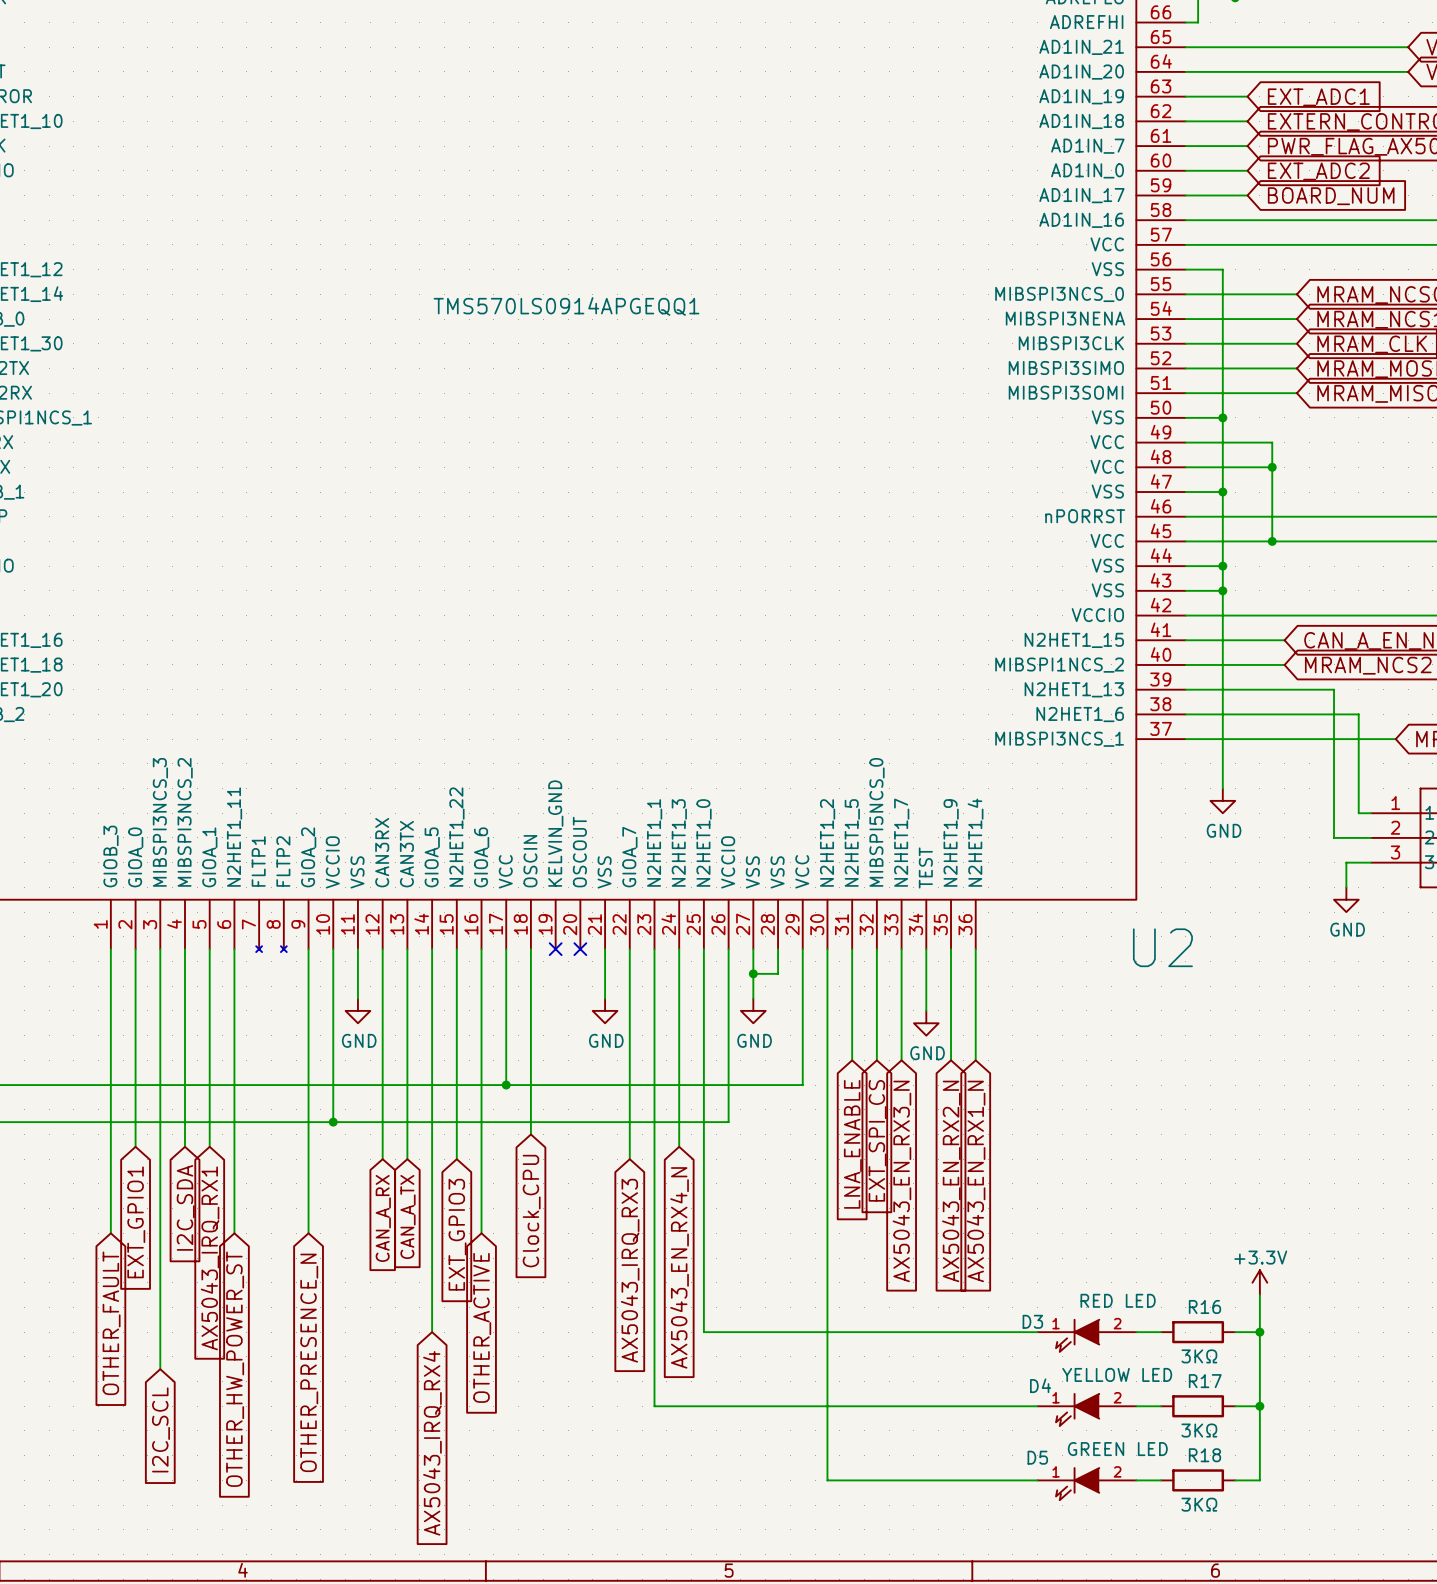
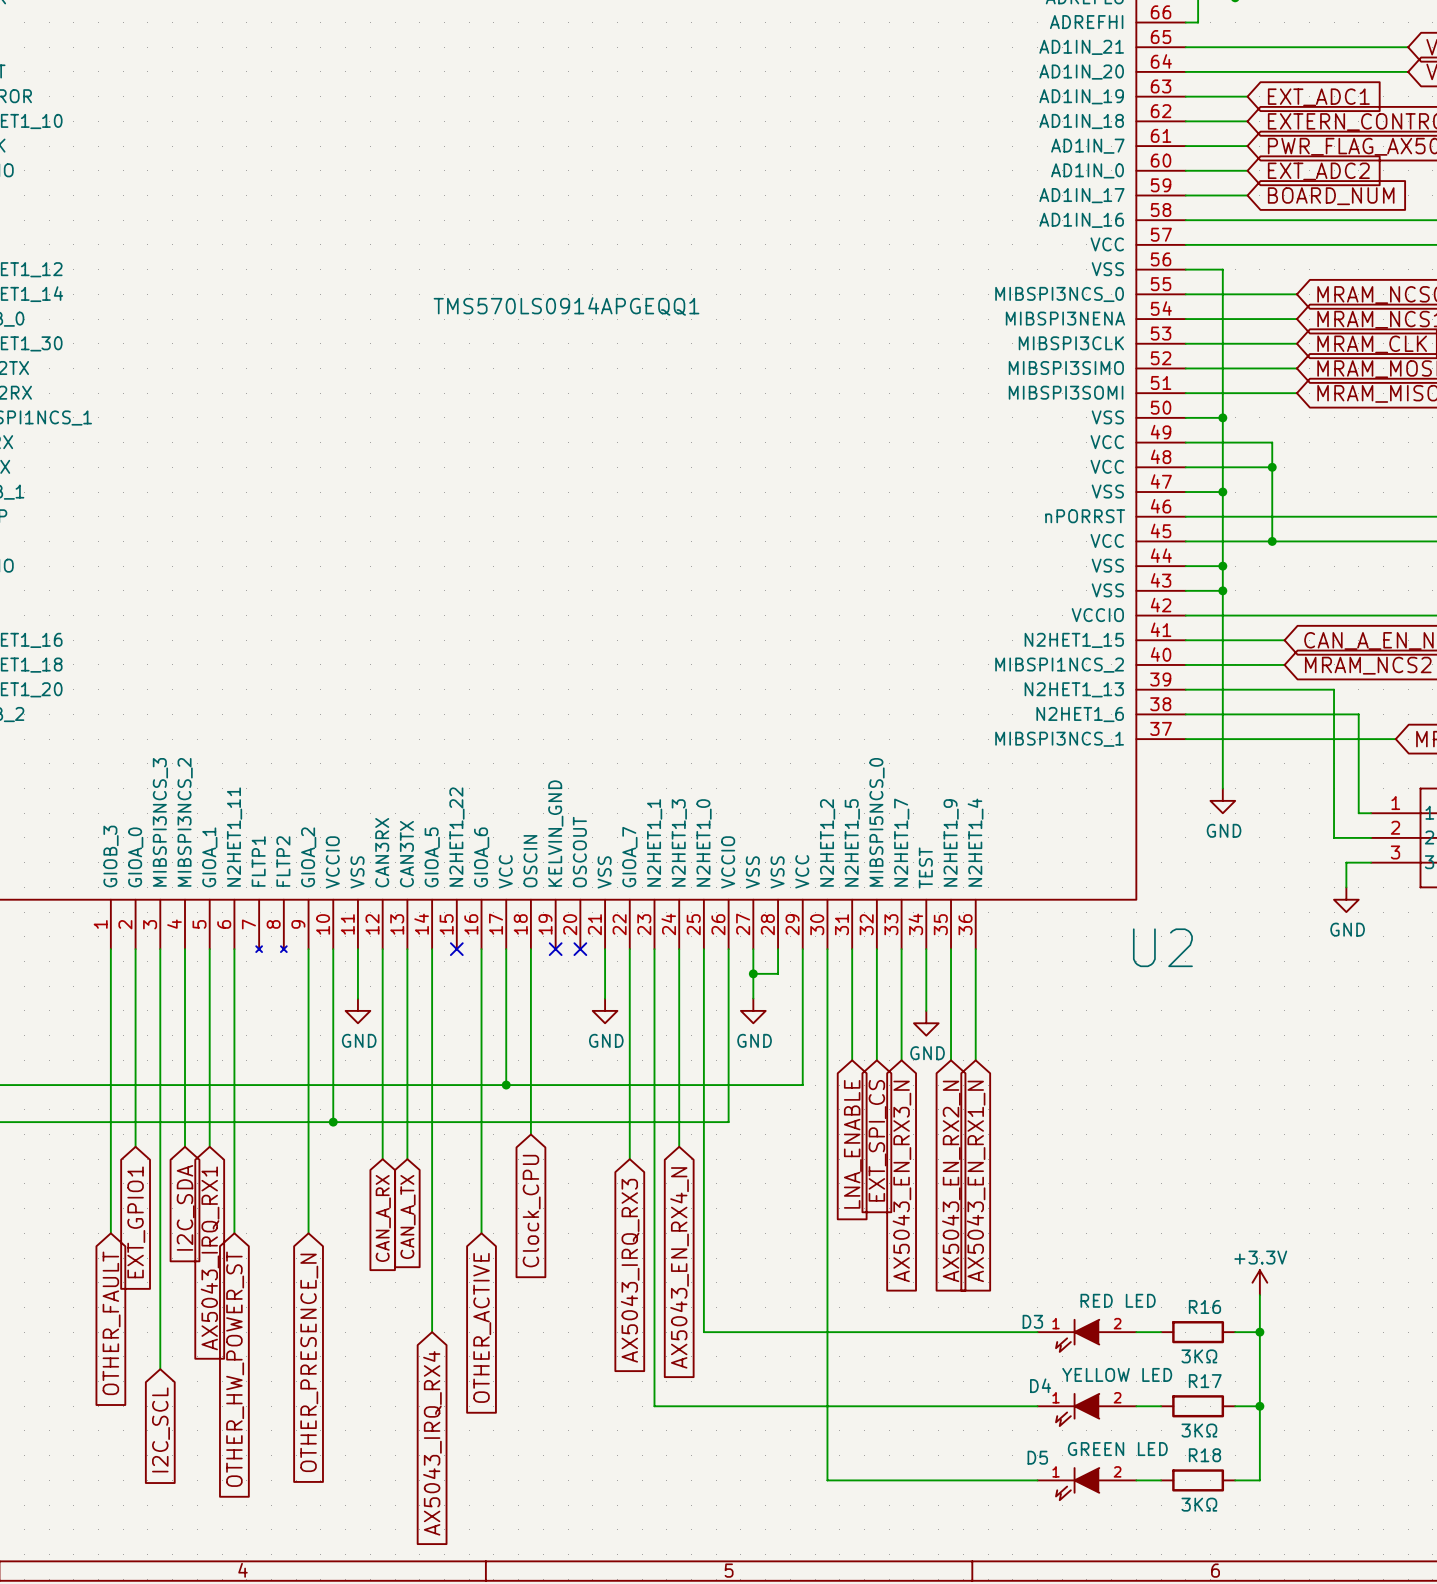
wire: (456, 949) (456, 1159) -> none
no-connect mark: none -> (456, 949)
global label: EXT_GPIO3 (457, 1234) -> none

